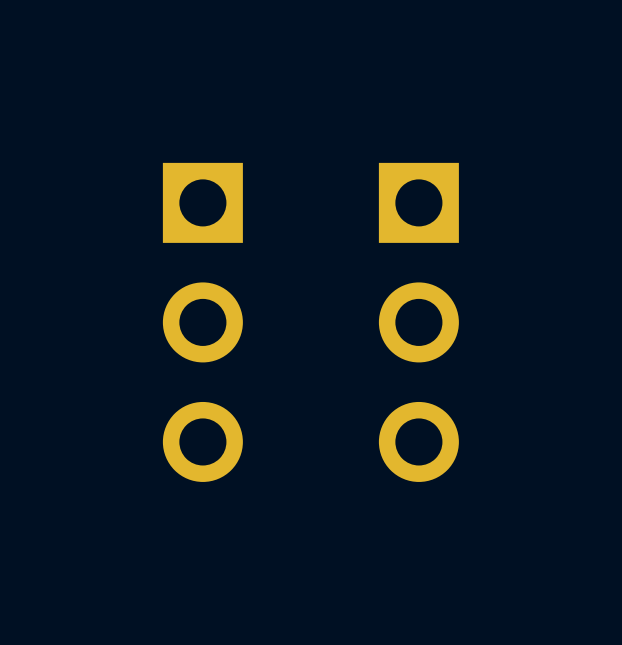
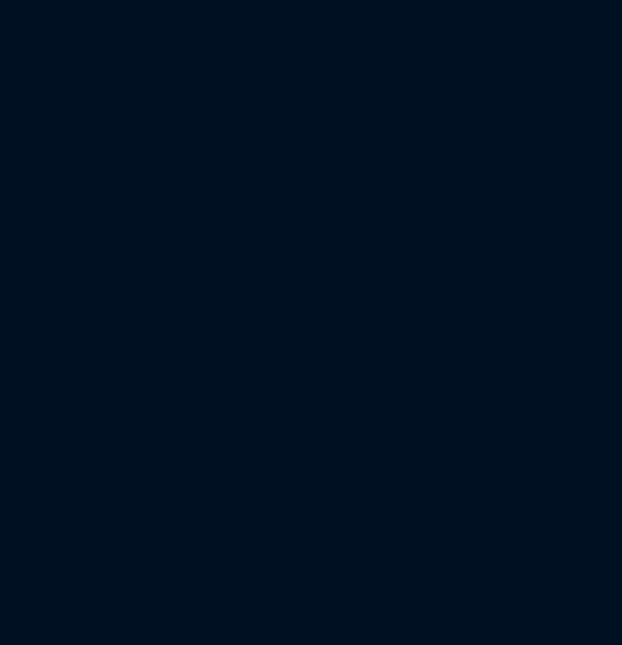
part: (202, 322) -> none
part: (418, 322) -> none

